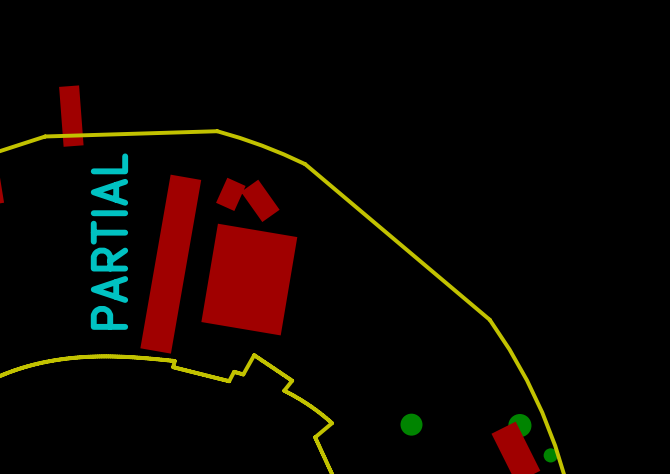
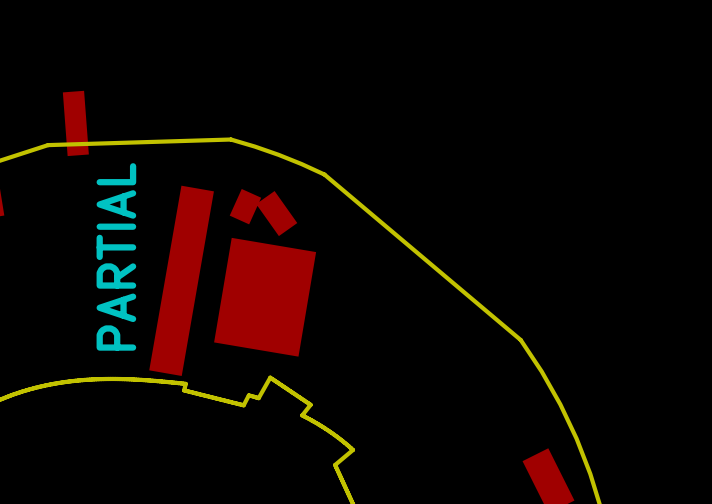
part: (411, 424) -> none
part: (519, 425) -> none
part: (550, 455) -> none

